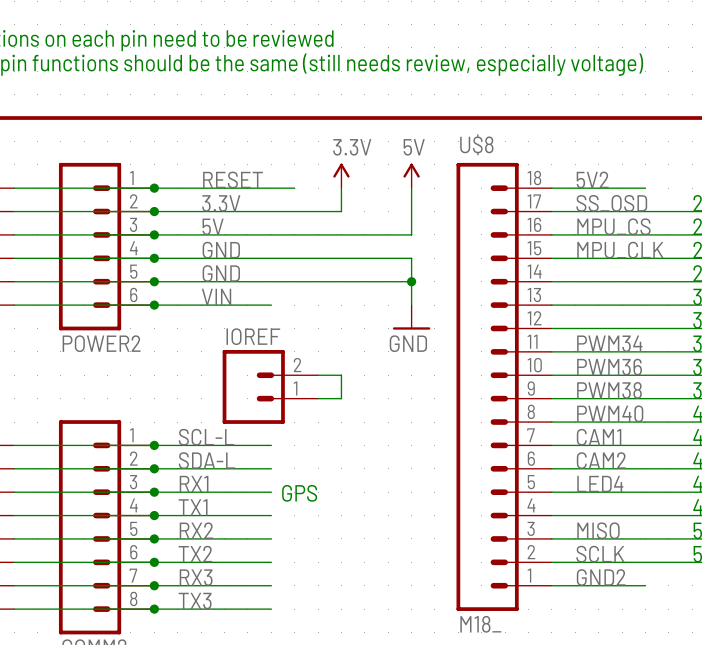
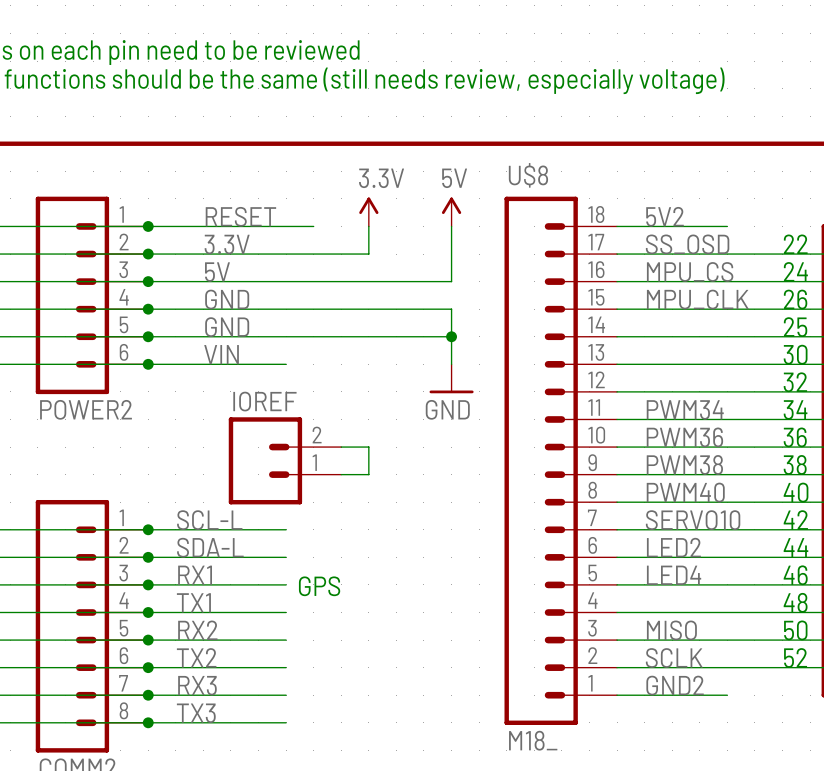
label: CAM1 (599, 437) -> SERVO10 (693, 520)
label: CAM2 (601, 460) -> LED2 (673, 547)

